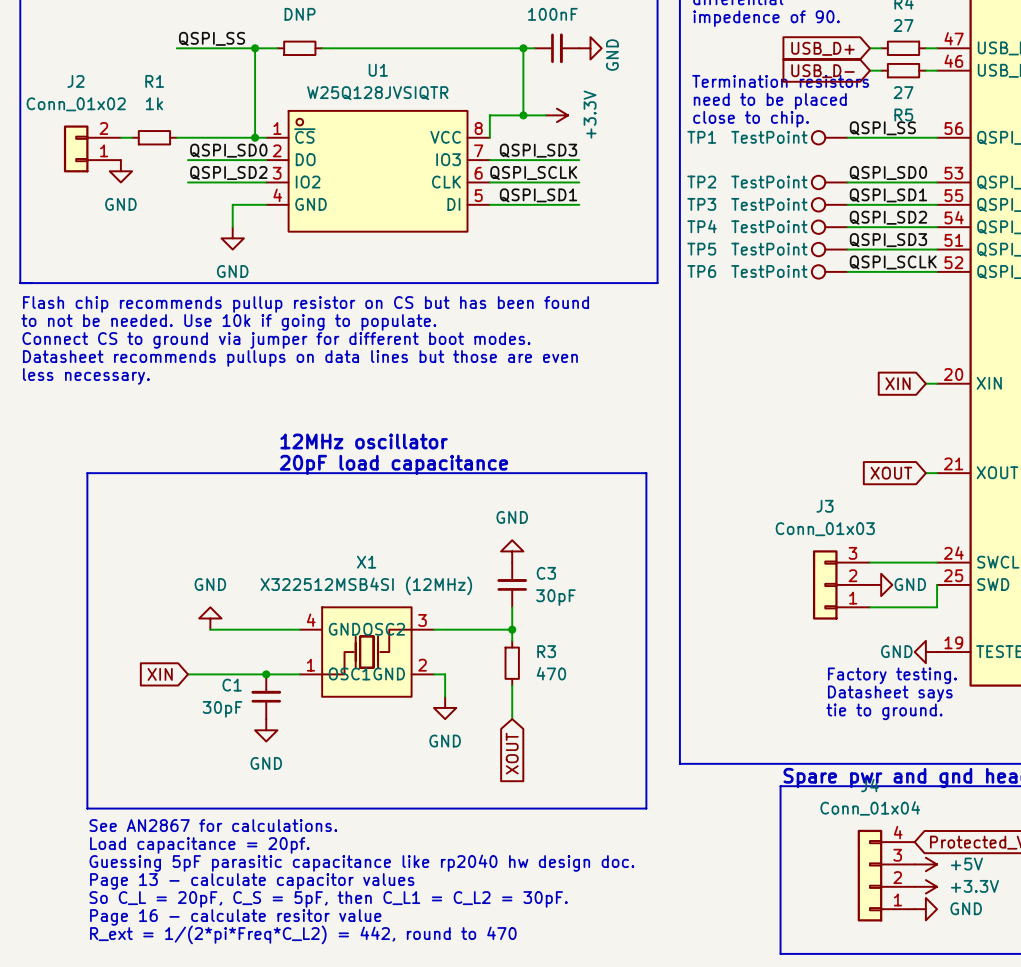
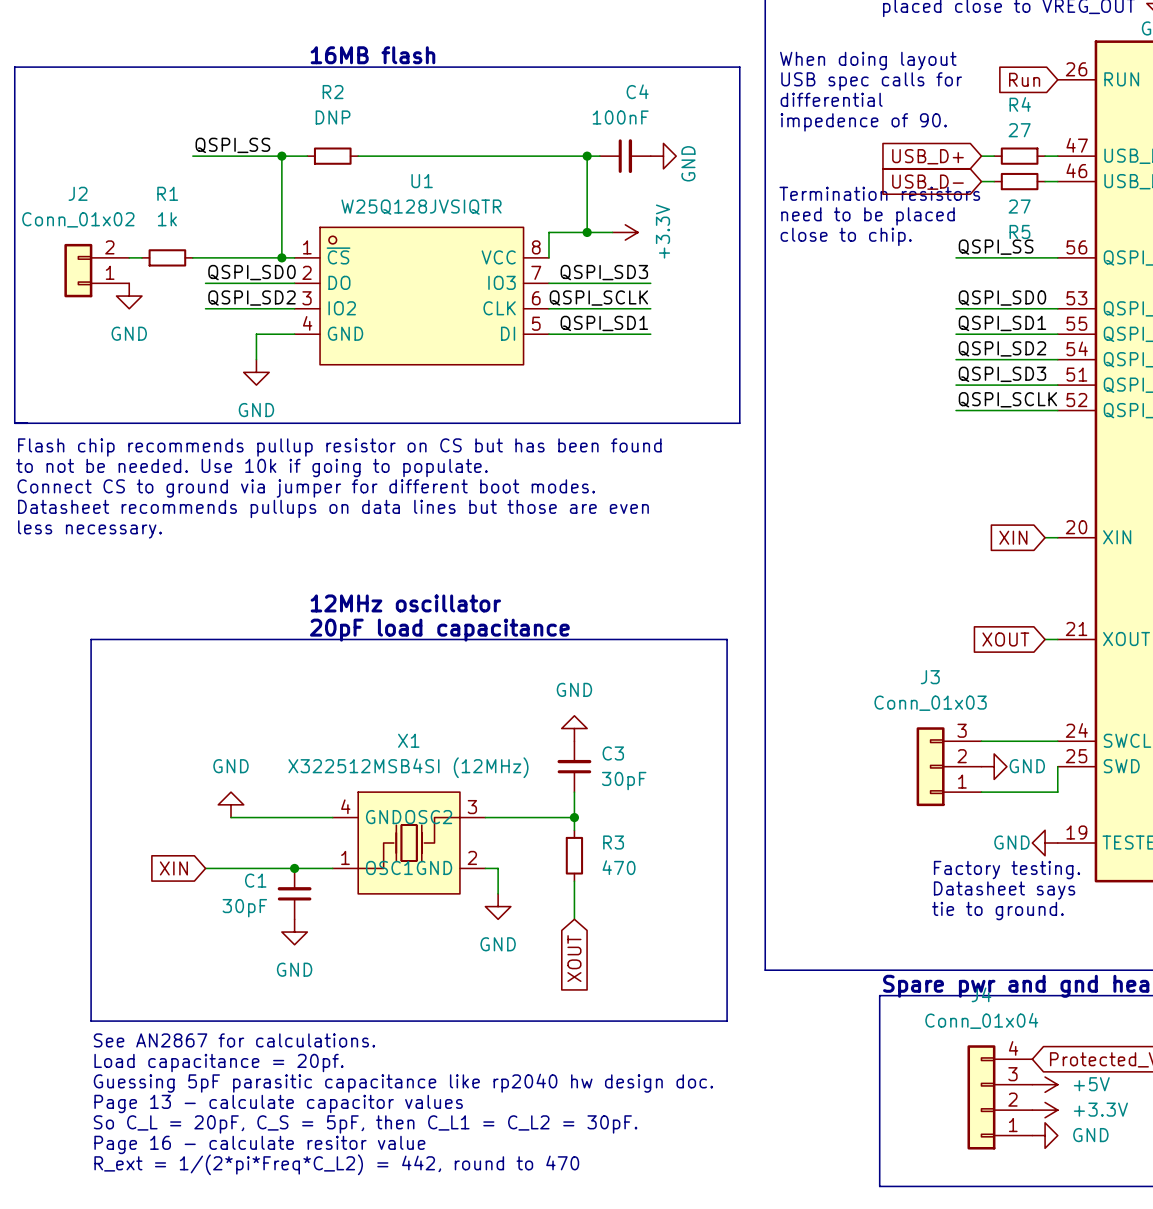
TP1: TestPoint (829, 137) -> none
TP2: TestPoint (829, 182) -> none
TP3: TestPoint (829, 204) -> none
TP4: TestPoint (829, 227) -> none
TP5: TestPoint (829, 249) -> none
TP6: TestPoint (829, 271) -> none

